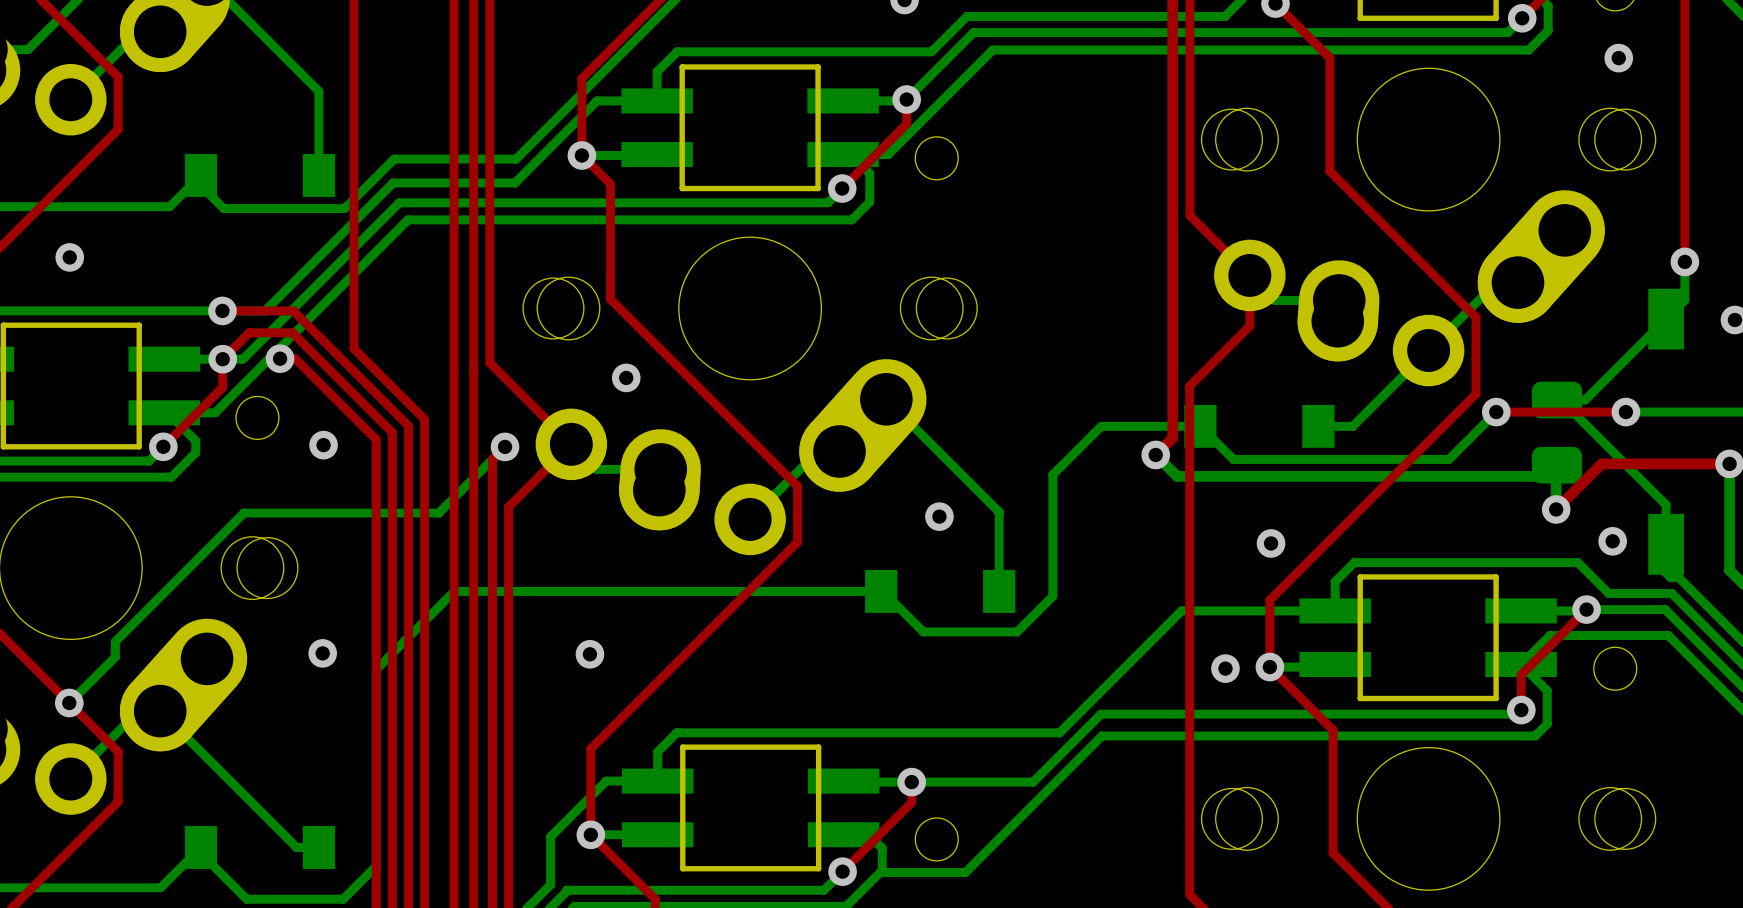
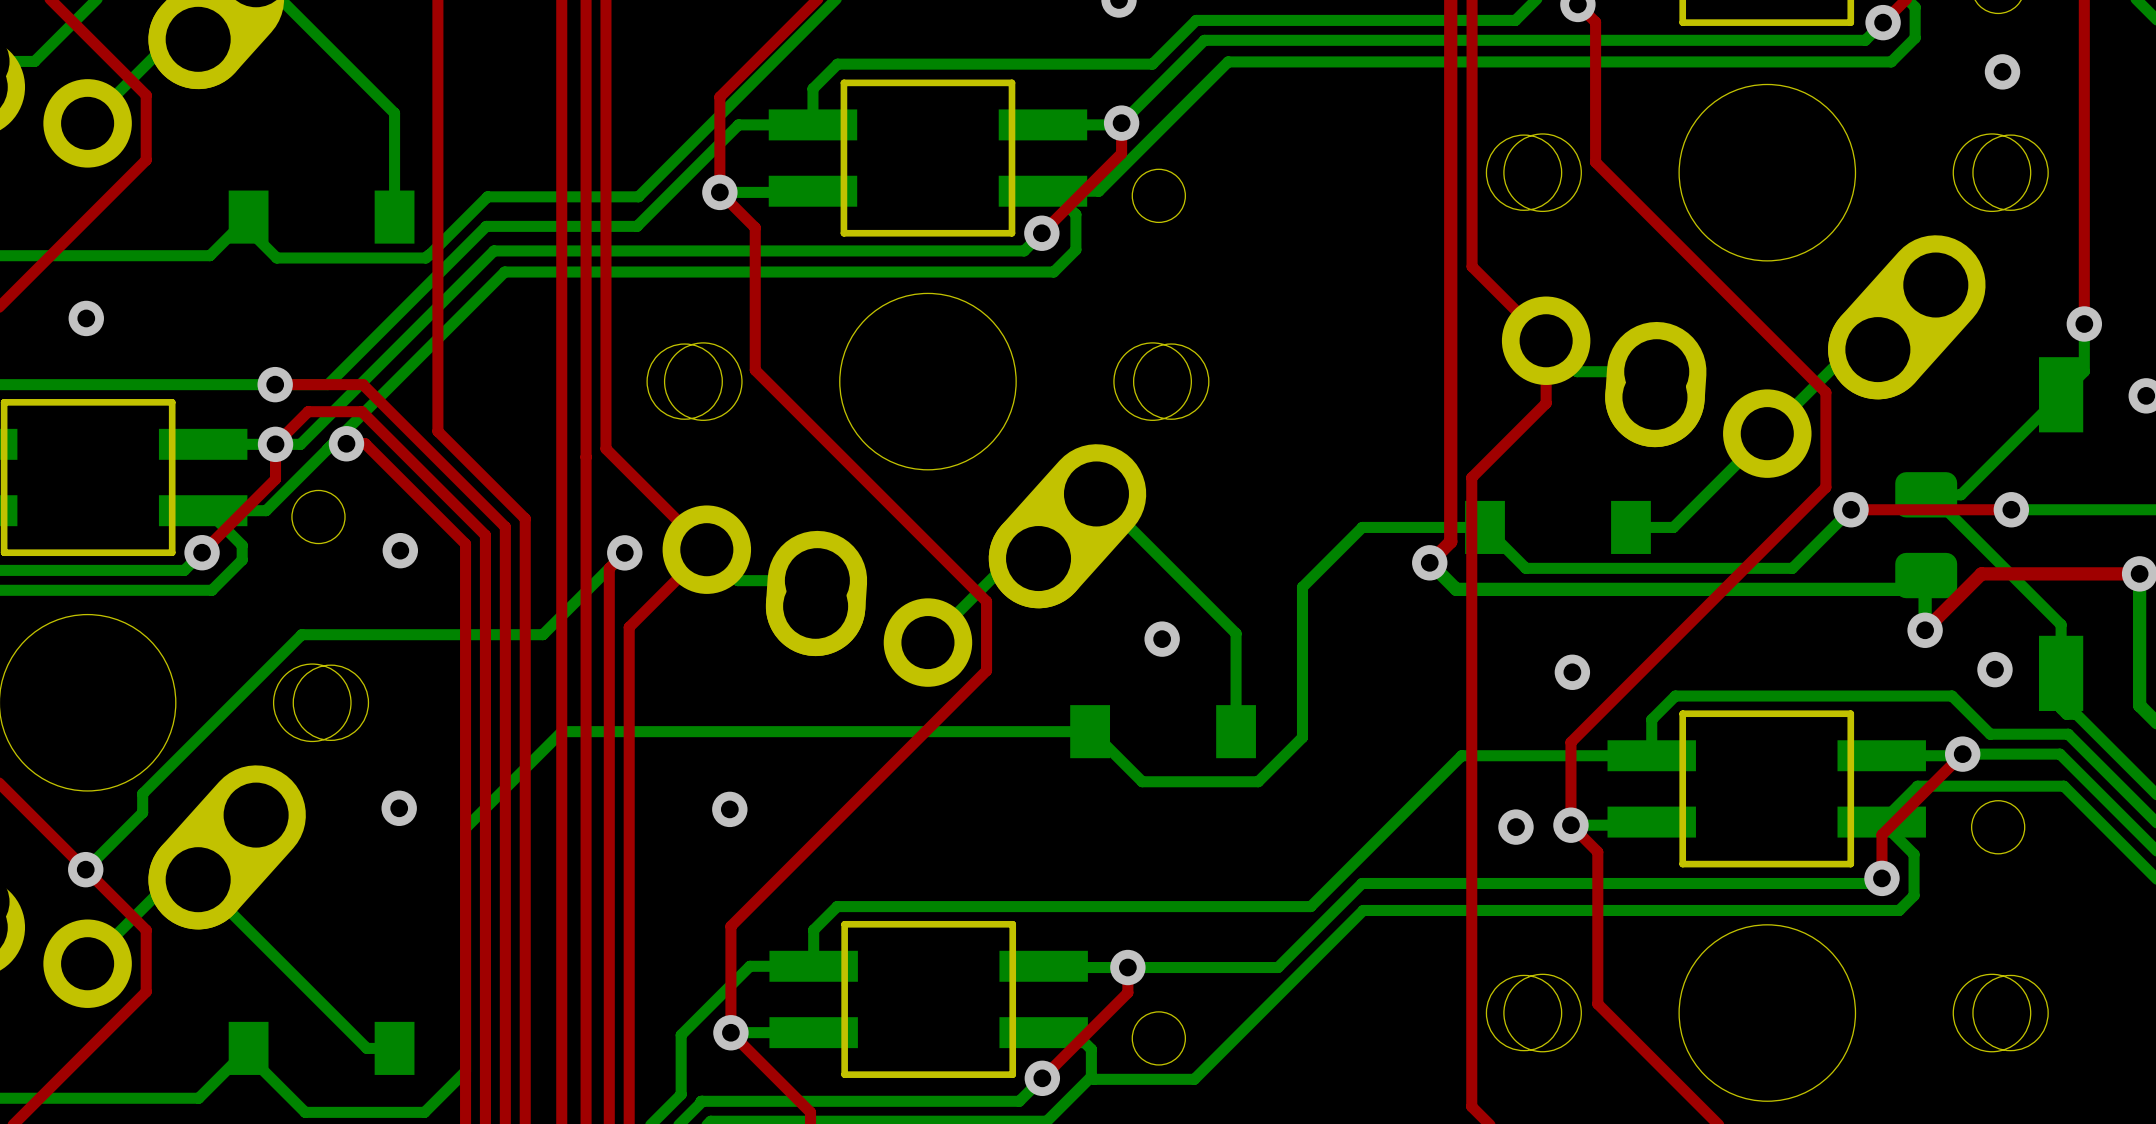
top track: (1289, 17) (1329, 57) (1329, 171) -> (1595, 22) (1595, 162) (1645, 211)
via: (626, 377) -> none
top track: (1291, 688) (1333, 730) (1333, 853) -> (1597, 852) (1597, 1004) (1649, 1055)

